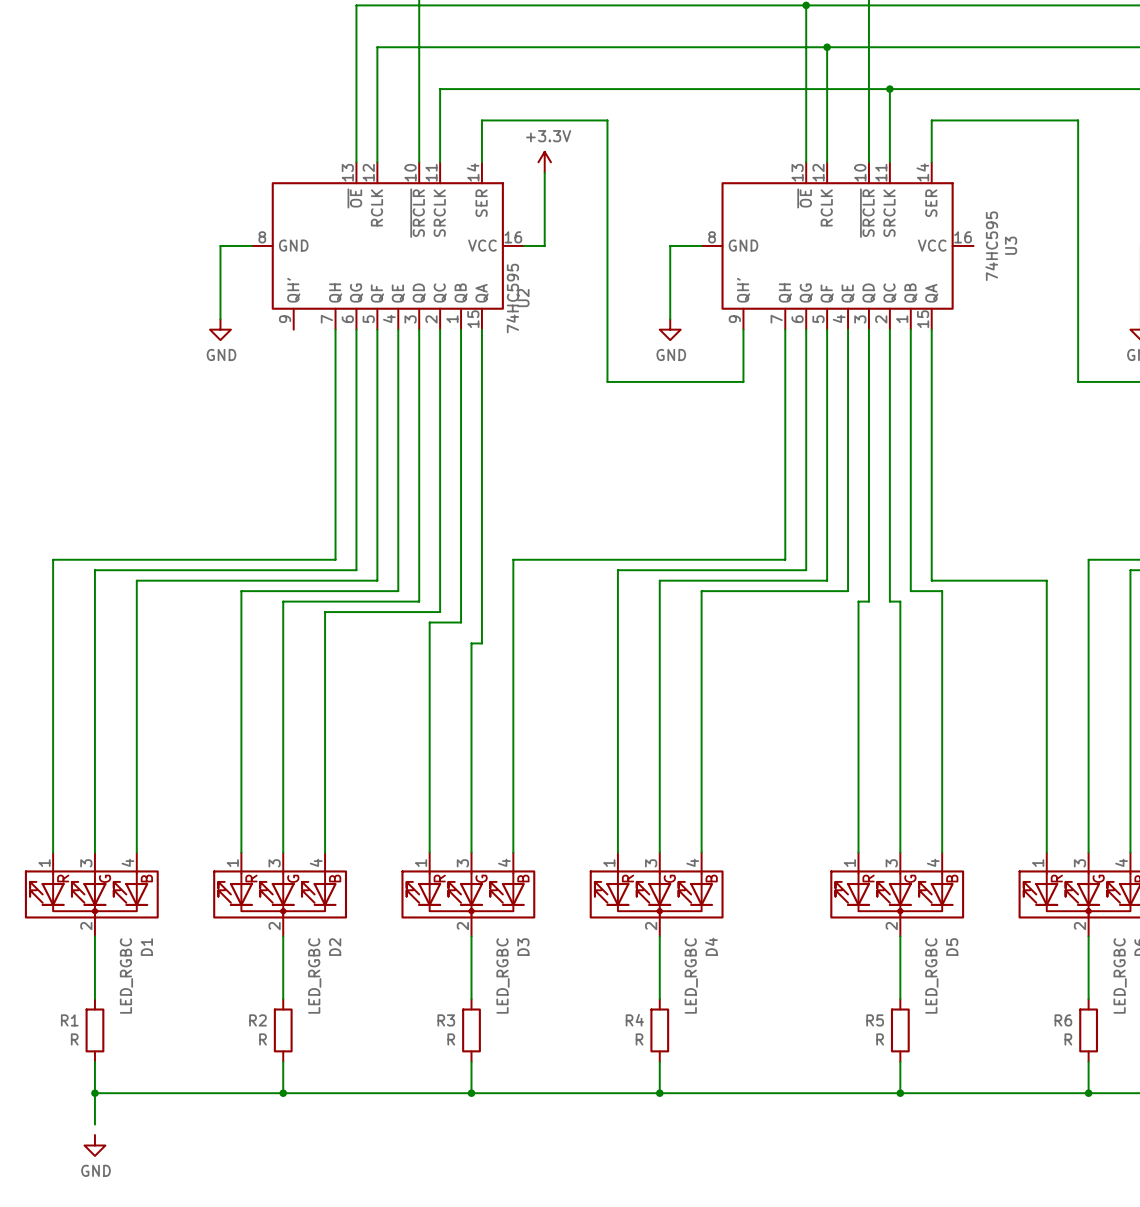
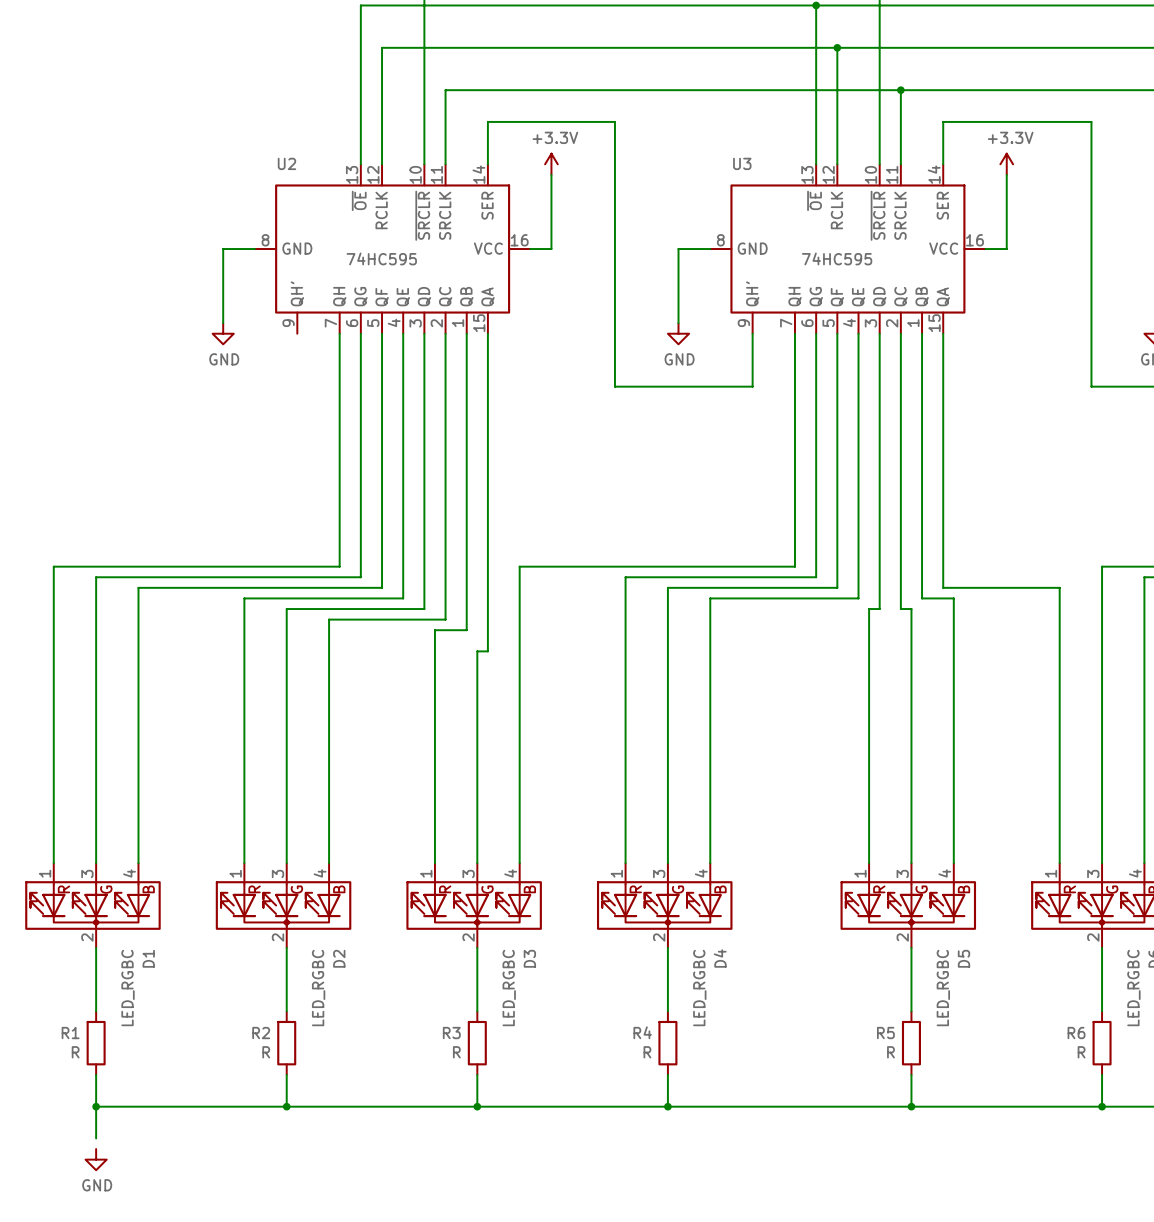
power symbol: none -> +3.3V (1006, 164)
wire: none -> (1006, 174) (1006, 249) (985, 249)
U3 name rotation: 0° (1011, 245) -> 90° clockwise (742, 163)
U3 name position: U3 (1011, 245) -> U3 (742, 163)
U3 value rotation: 0° (991, 246) -> 90° clockwise (837, 258)
U3 value position: 74HC595 (991, 246) -> 74HC595 (837, 258)
U2 value rotation: 0° (512, 298) -> 90° clockwise (381, 258)
U2 value position: 74HC595 (512, 298) -> 74HC595 (381, 258)
U2 name rotation: 0° (523, 298) -> 90° clockwise (286, 163)
U2 name position: U2 (523, 298) -> U2 (286, 163)

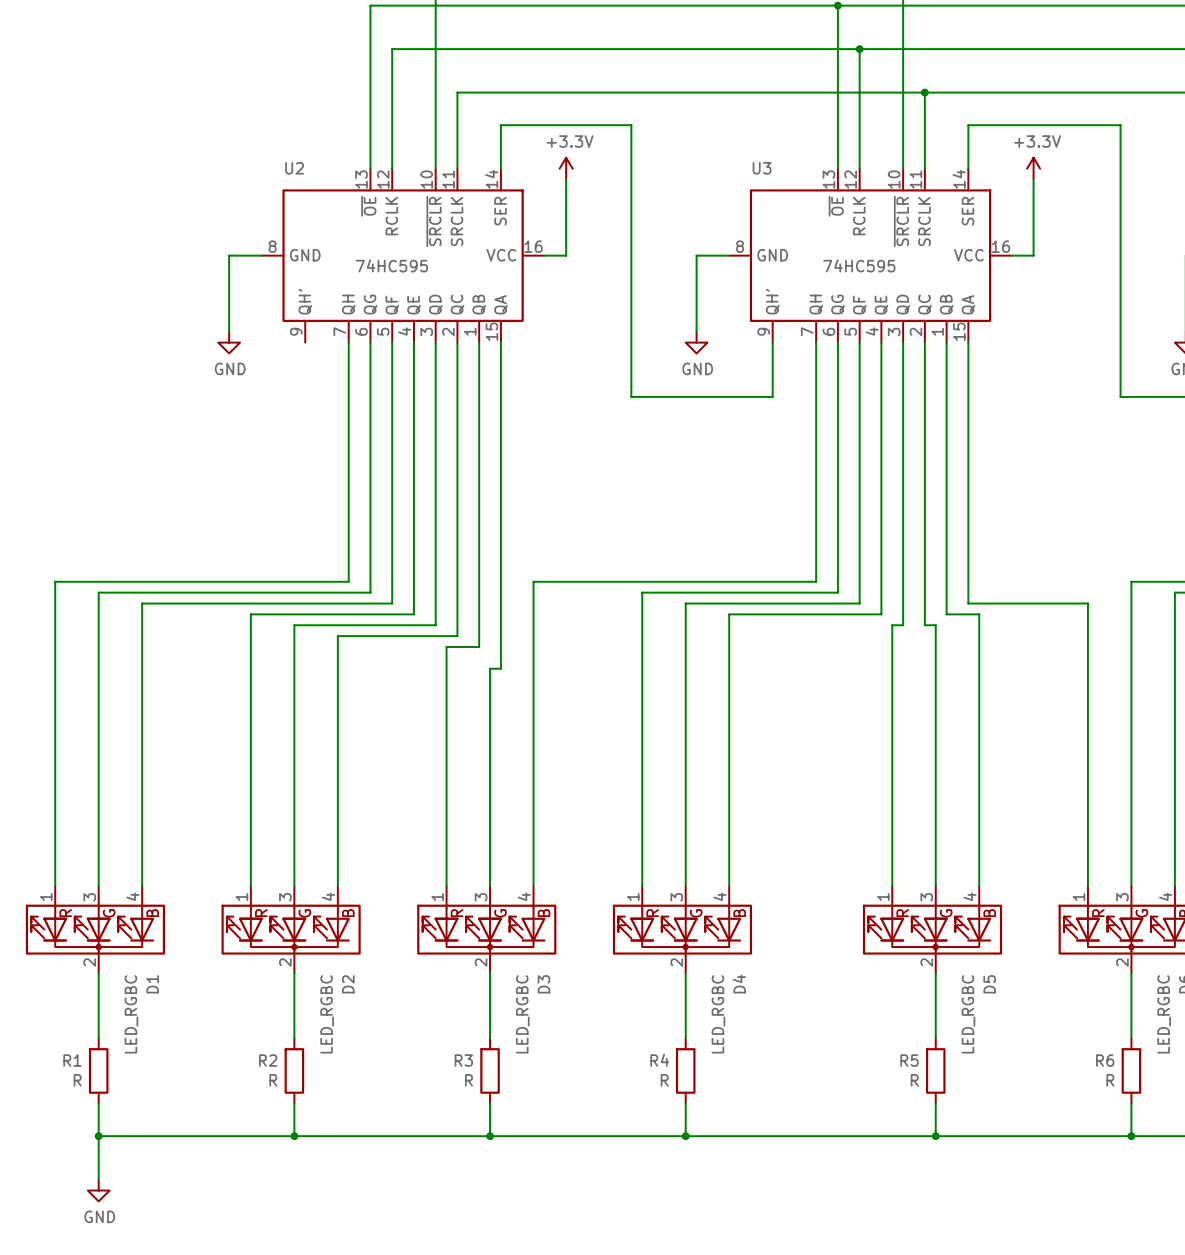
wire: none -> (98, 1168) (98, 1179)

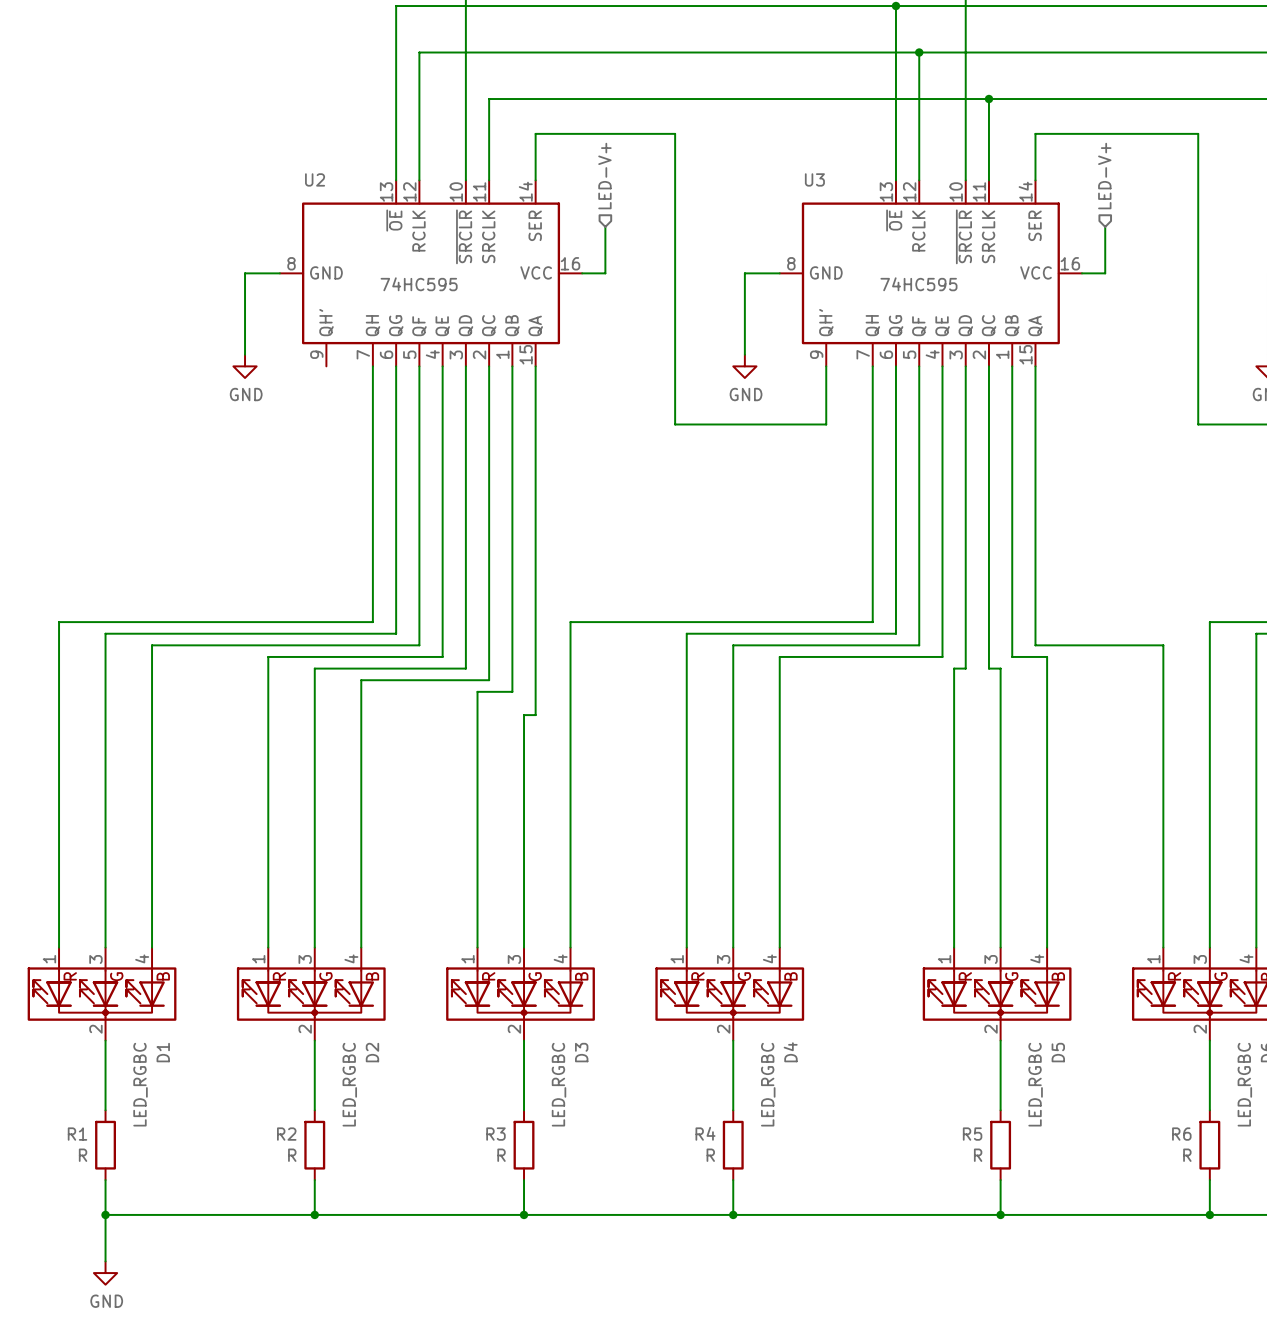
hierarchical label: none -> LED-V+ (604, 176)
hierarchical label: none -> LED-V+ (1104, 176)
power symbol: +3.3V (566, 168) -> none
power symbol: +3.3V (1033, 168) -> none
wire: (566, 179) (566, 212) -> none
wire: (1033, 179) (1033, 212) -> none

